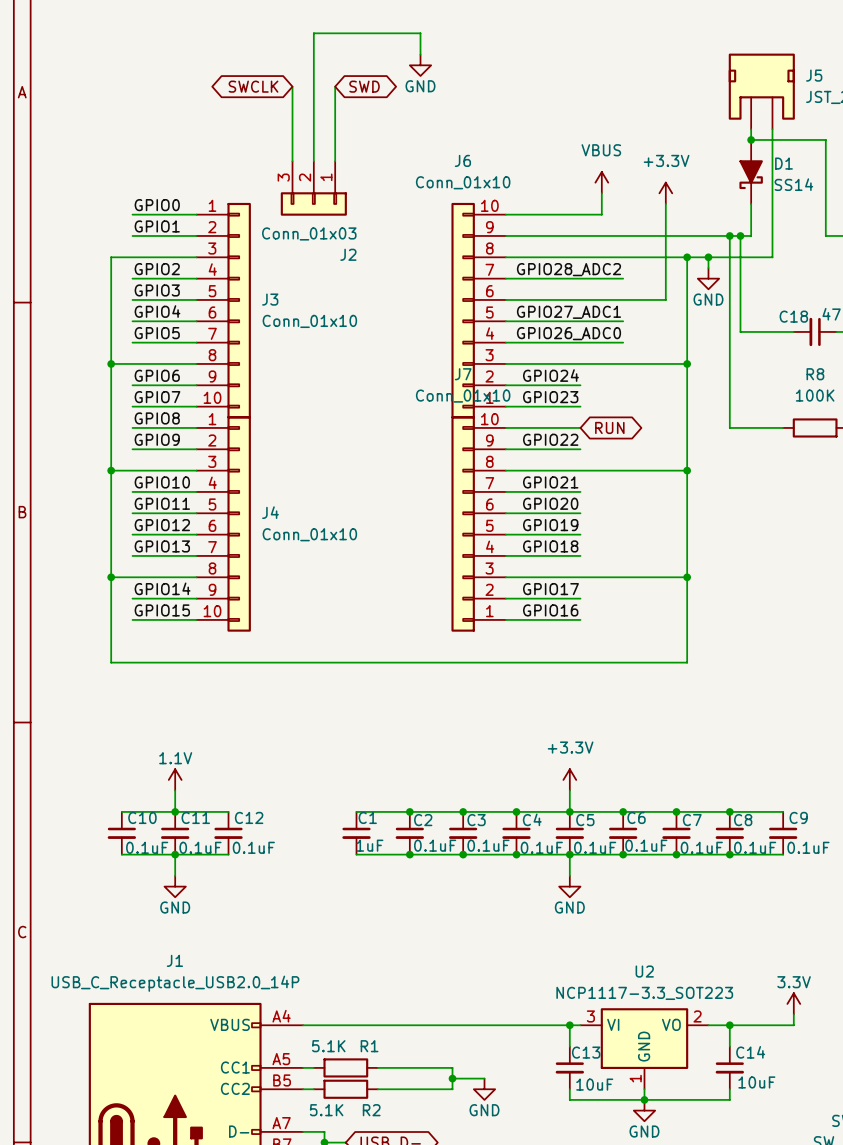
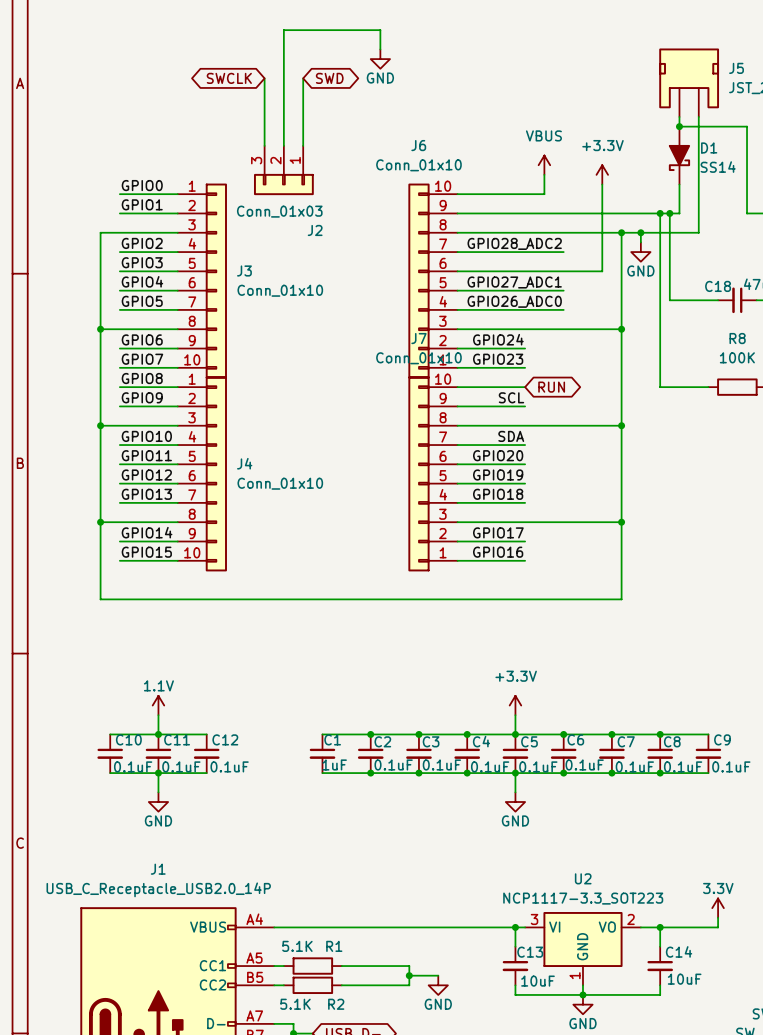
label: GPIO22 (550, 439) -> SCL (511, 397)
label: GPIO21 (550, 482) -> SDA (511, 436)

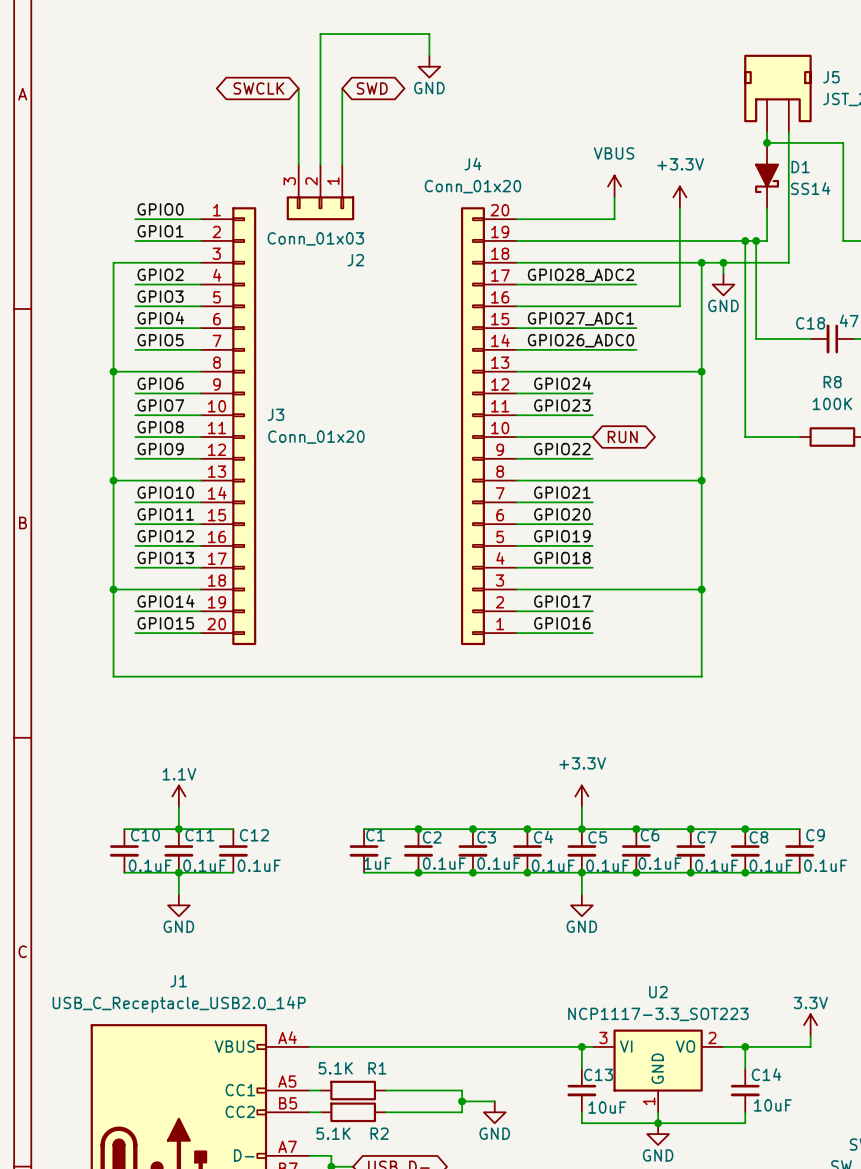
J3 symbol: [177, 183, 227, 379] -> [200, 207, 257, 646]
J6: Conn_01x10 (432, 281) -> none
J3 value: Conn_01x10 (280, 290) -> Conn_01x20 (316, 437)
J4 symbol: [177, 376, 227, 572] -> [460, 207, 517, 646]
label: SCL (511, 397) -> GPIO22 (562, 449)
label: SDA (511, 436) -> GPIO21 (562, 492)
J4 name position: J4 (244, 463) -> J4 (472, 164)
J7: Conn_01x10 (432, 473) -> none
J4 value: Conn_01x10 (280, 483) -> Conn_01x20 (472, 186)

